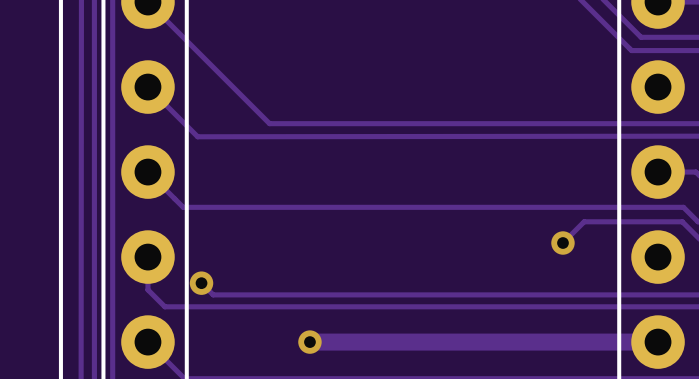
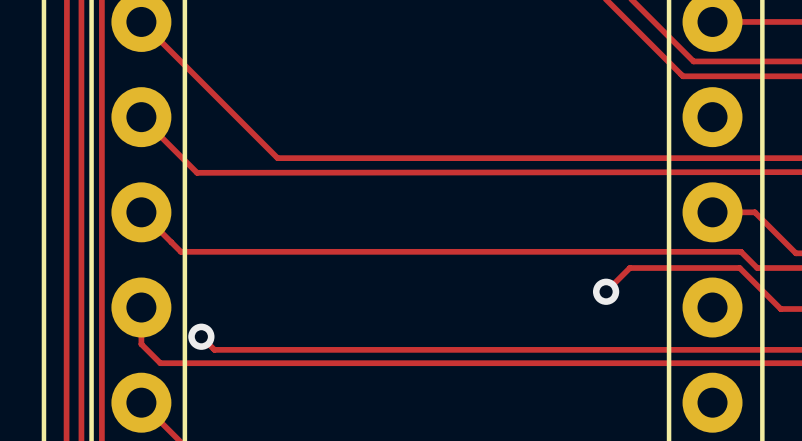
track: (309, 342) (658, 342) -> none
via: (309, 342) -> none

